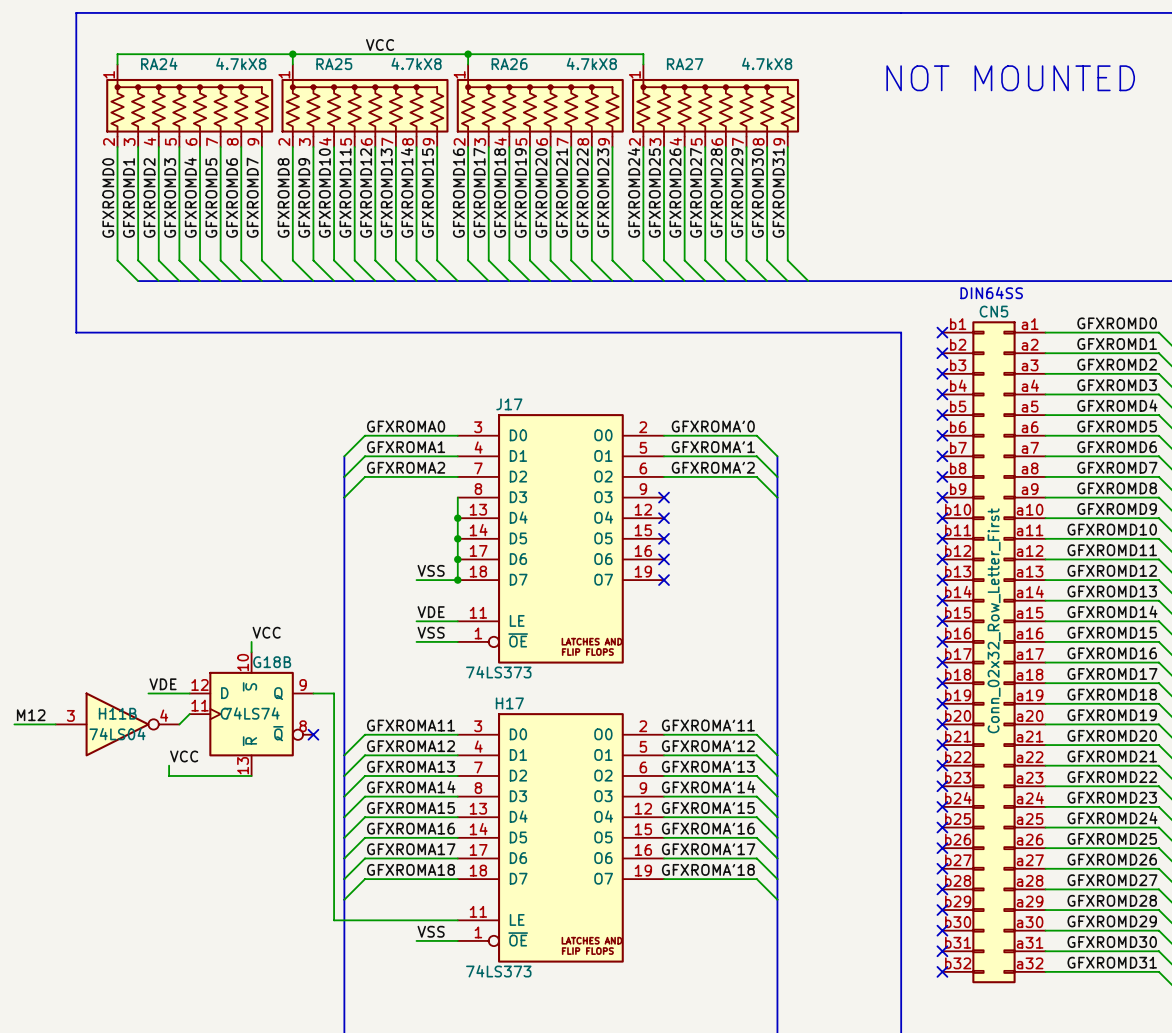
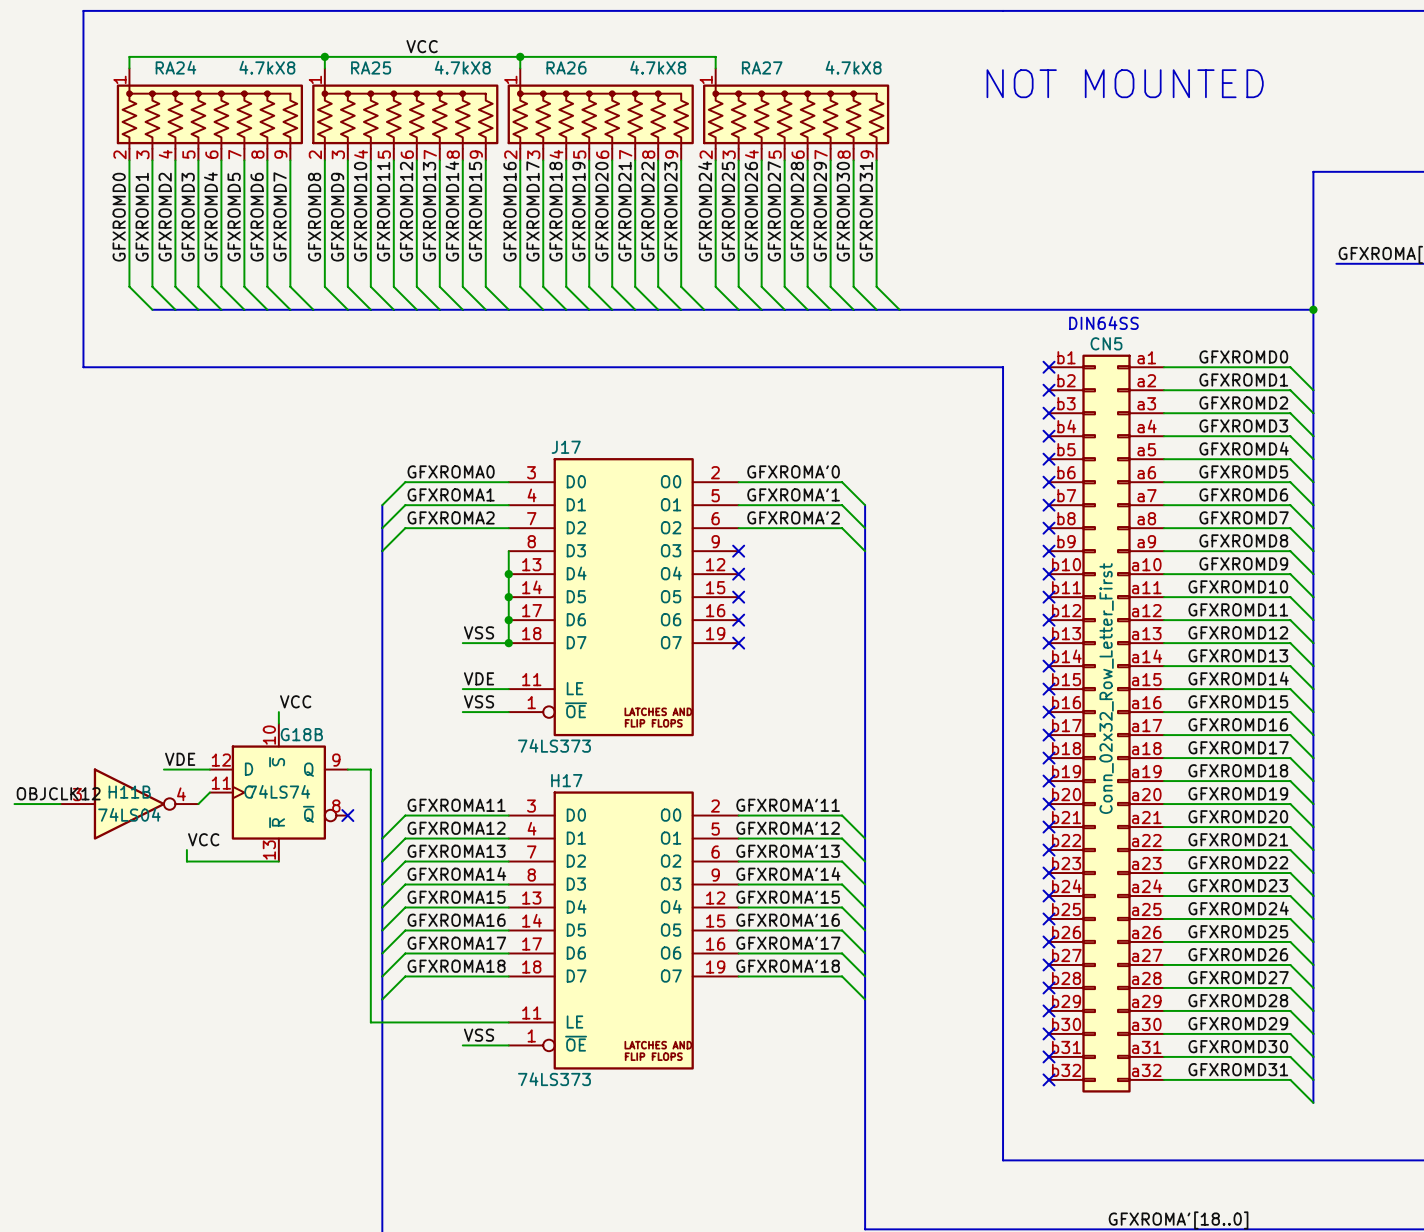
label: M12 (31, 715) -> OBJCLK12 (58, 793)

